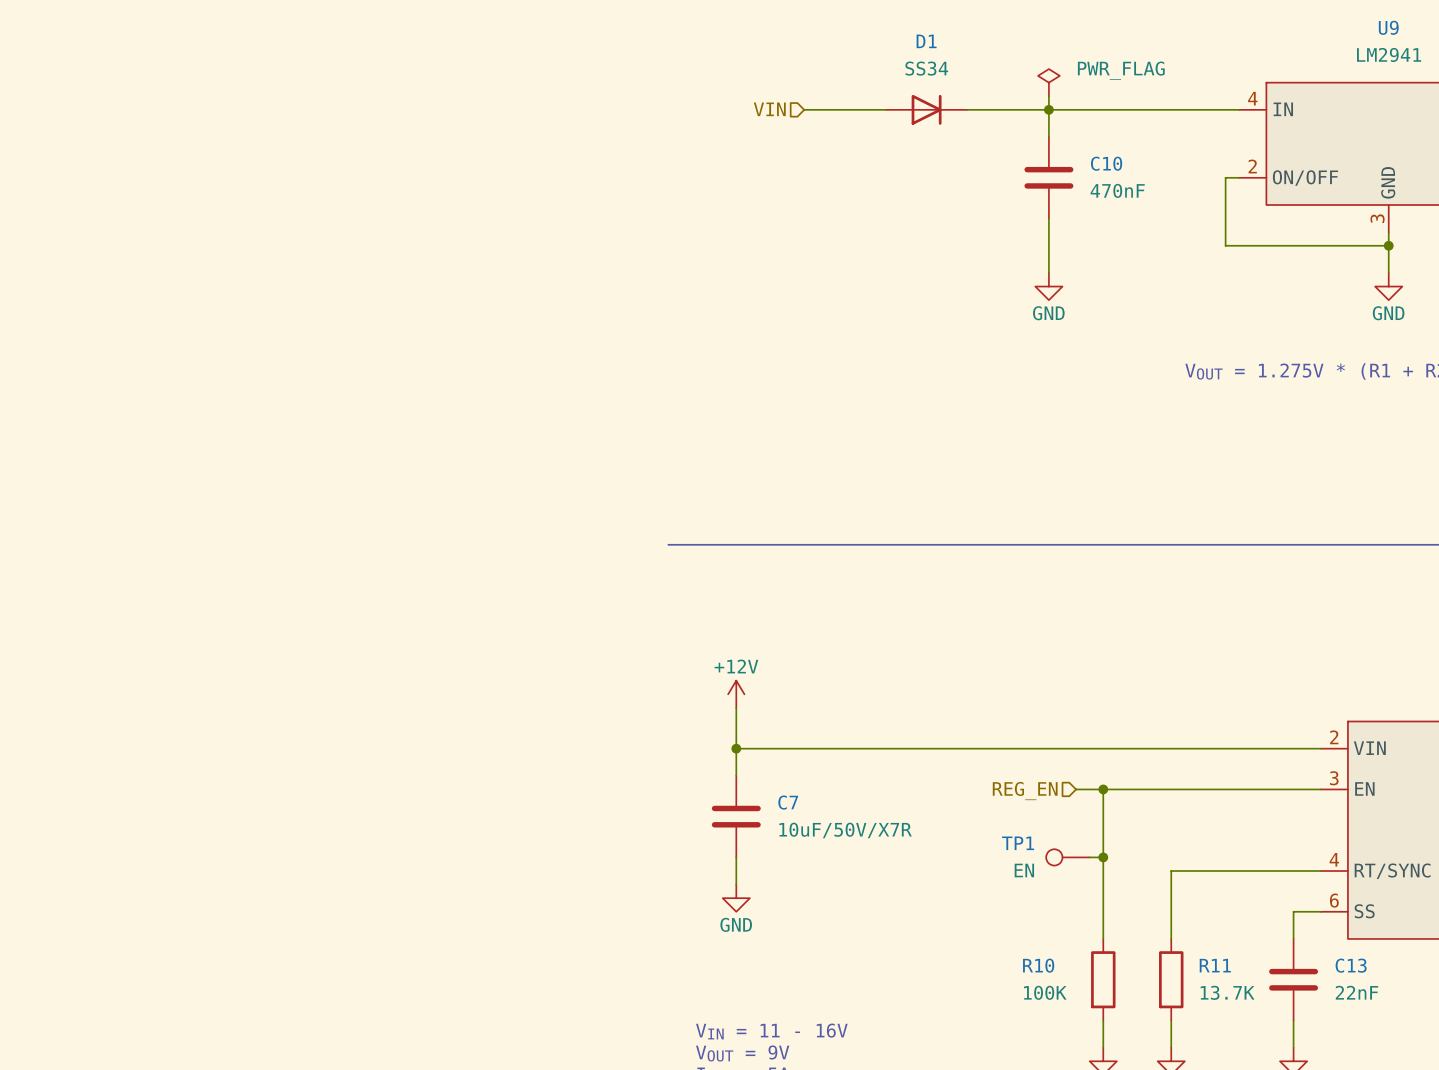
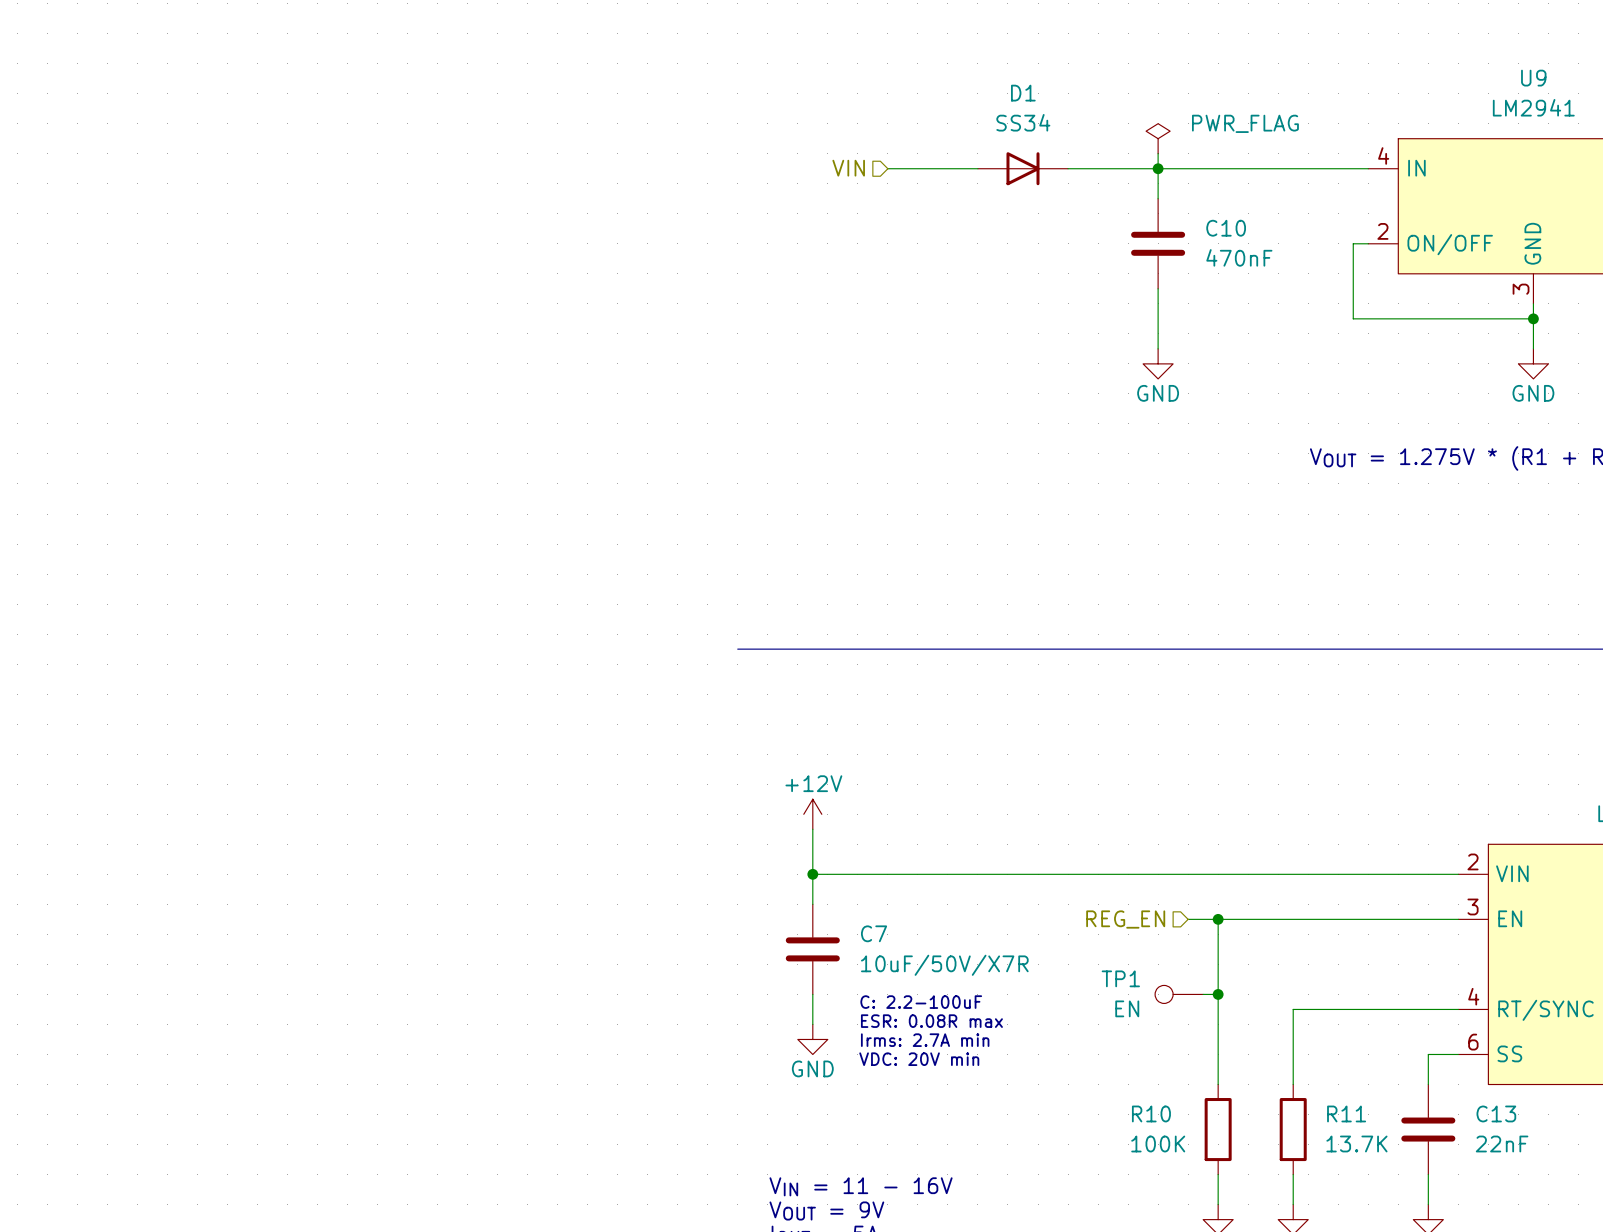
text: none -> C: 2.2-100uF (921, 1002)
text: none -> ESR: 0.08R max (931, 1021)
text: none -> Irms: 2.7A min (925, 1040)
text: none -> VDC: 20V min (919, 1059)

